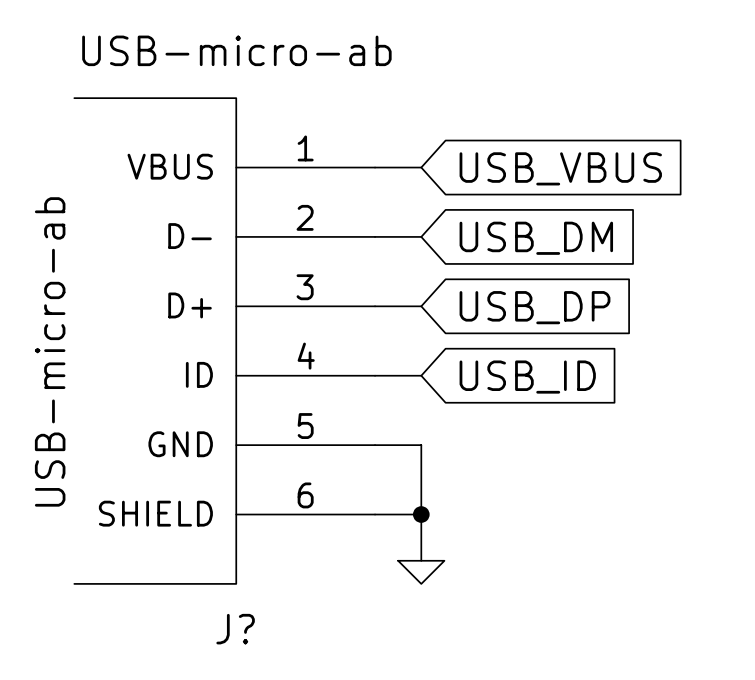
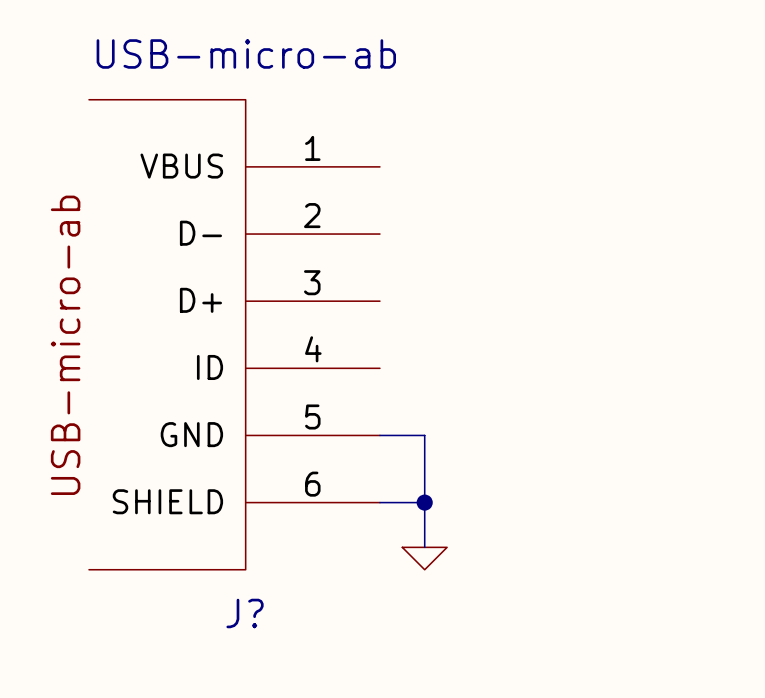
wire: (375, 167) (421, 167) -> none
global label: USB_VBUS (560, 168) -> none
wire: (375, 236) (421, 236) -> none
global label: USB_DM (536, 238) -> none
wire: (375, 306) (421, 306) -> none
global label: USB_DP (534, 307) -> none
wire: (375, 375) (421, 375) -> none
global label: USB_ID (527, 377) -> none

